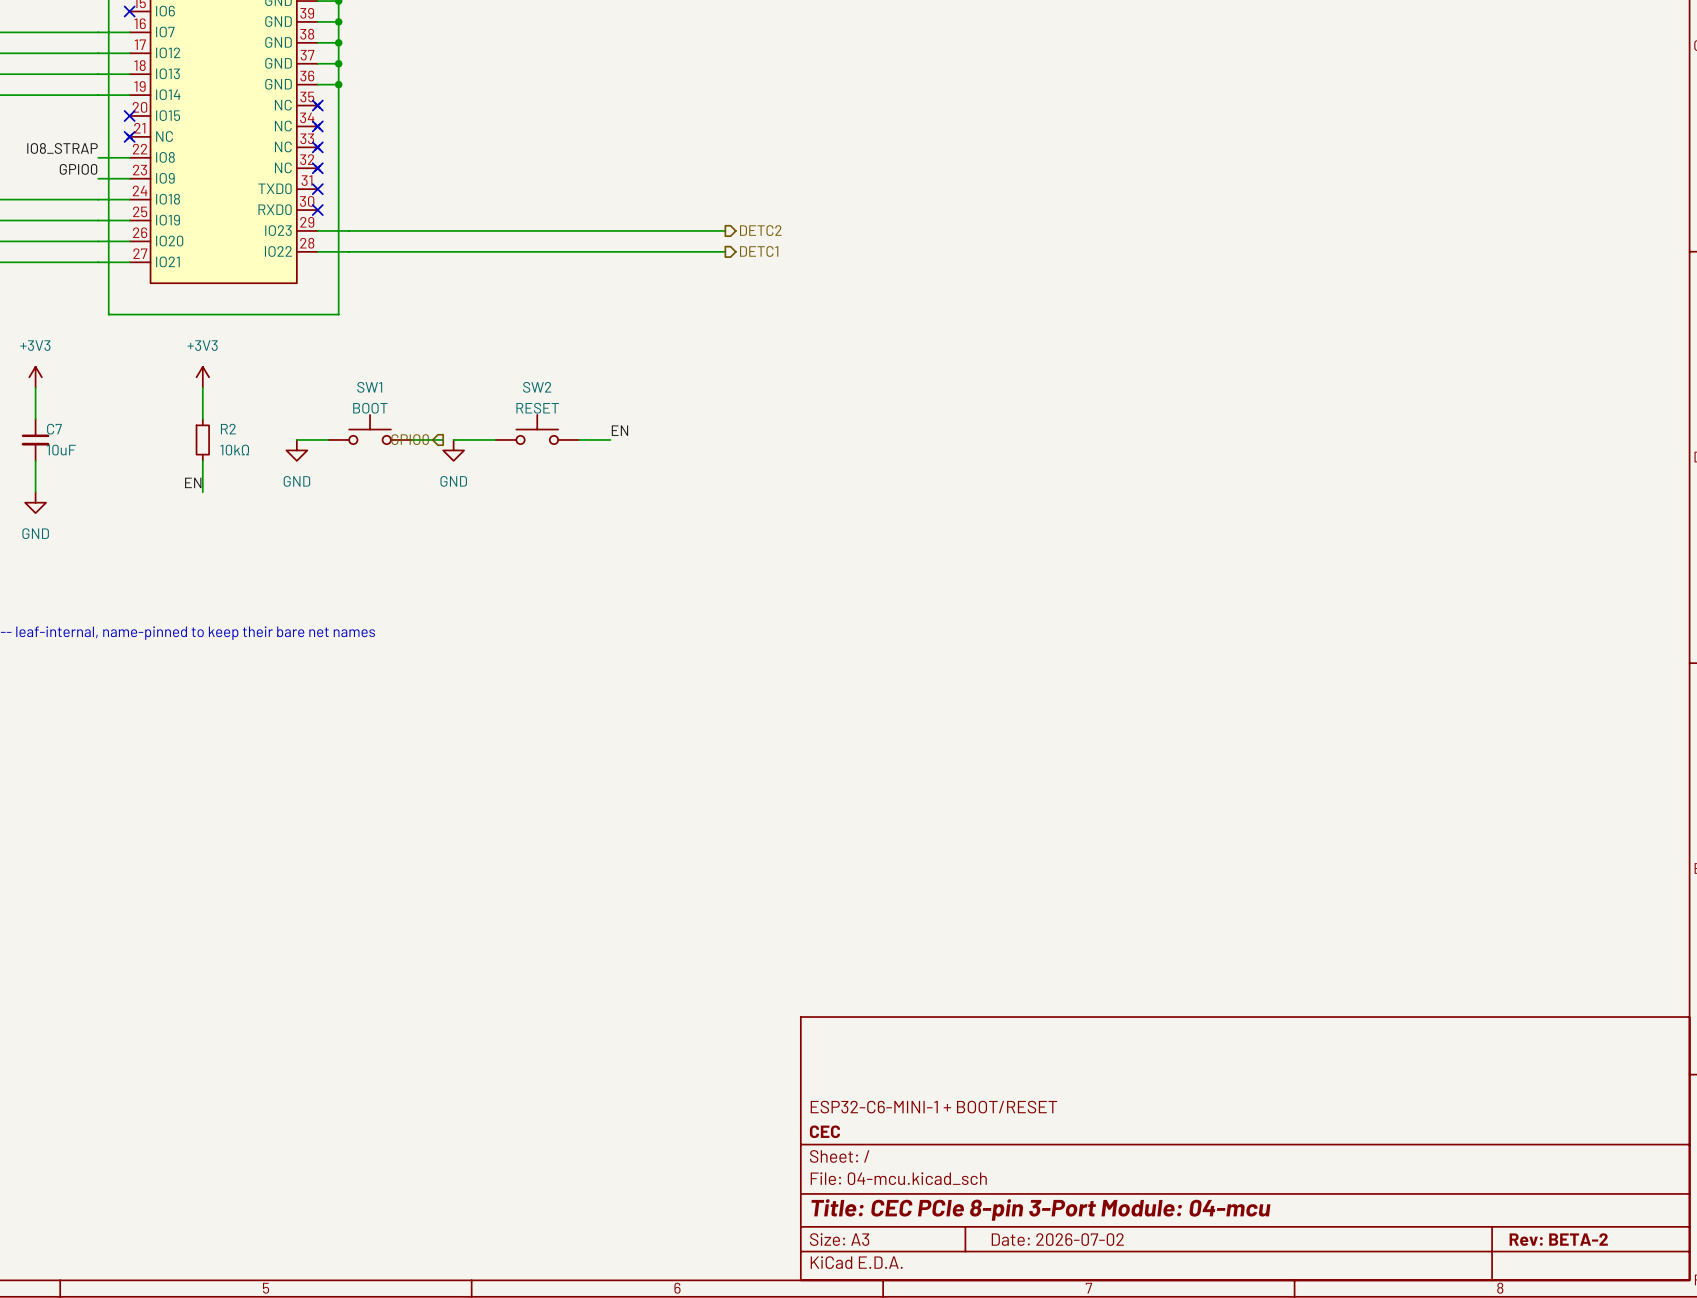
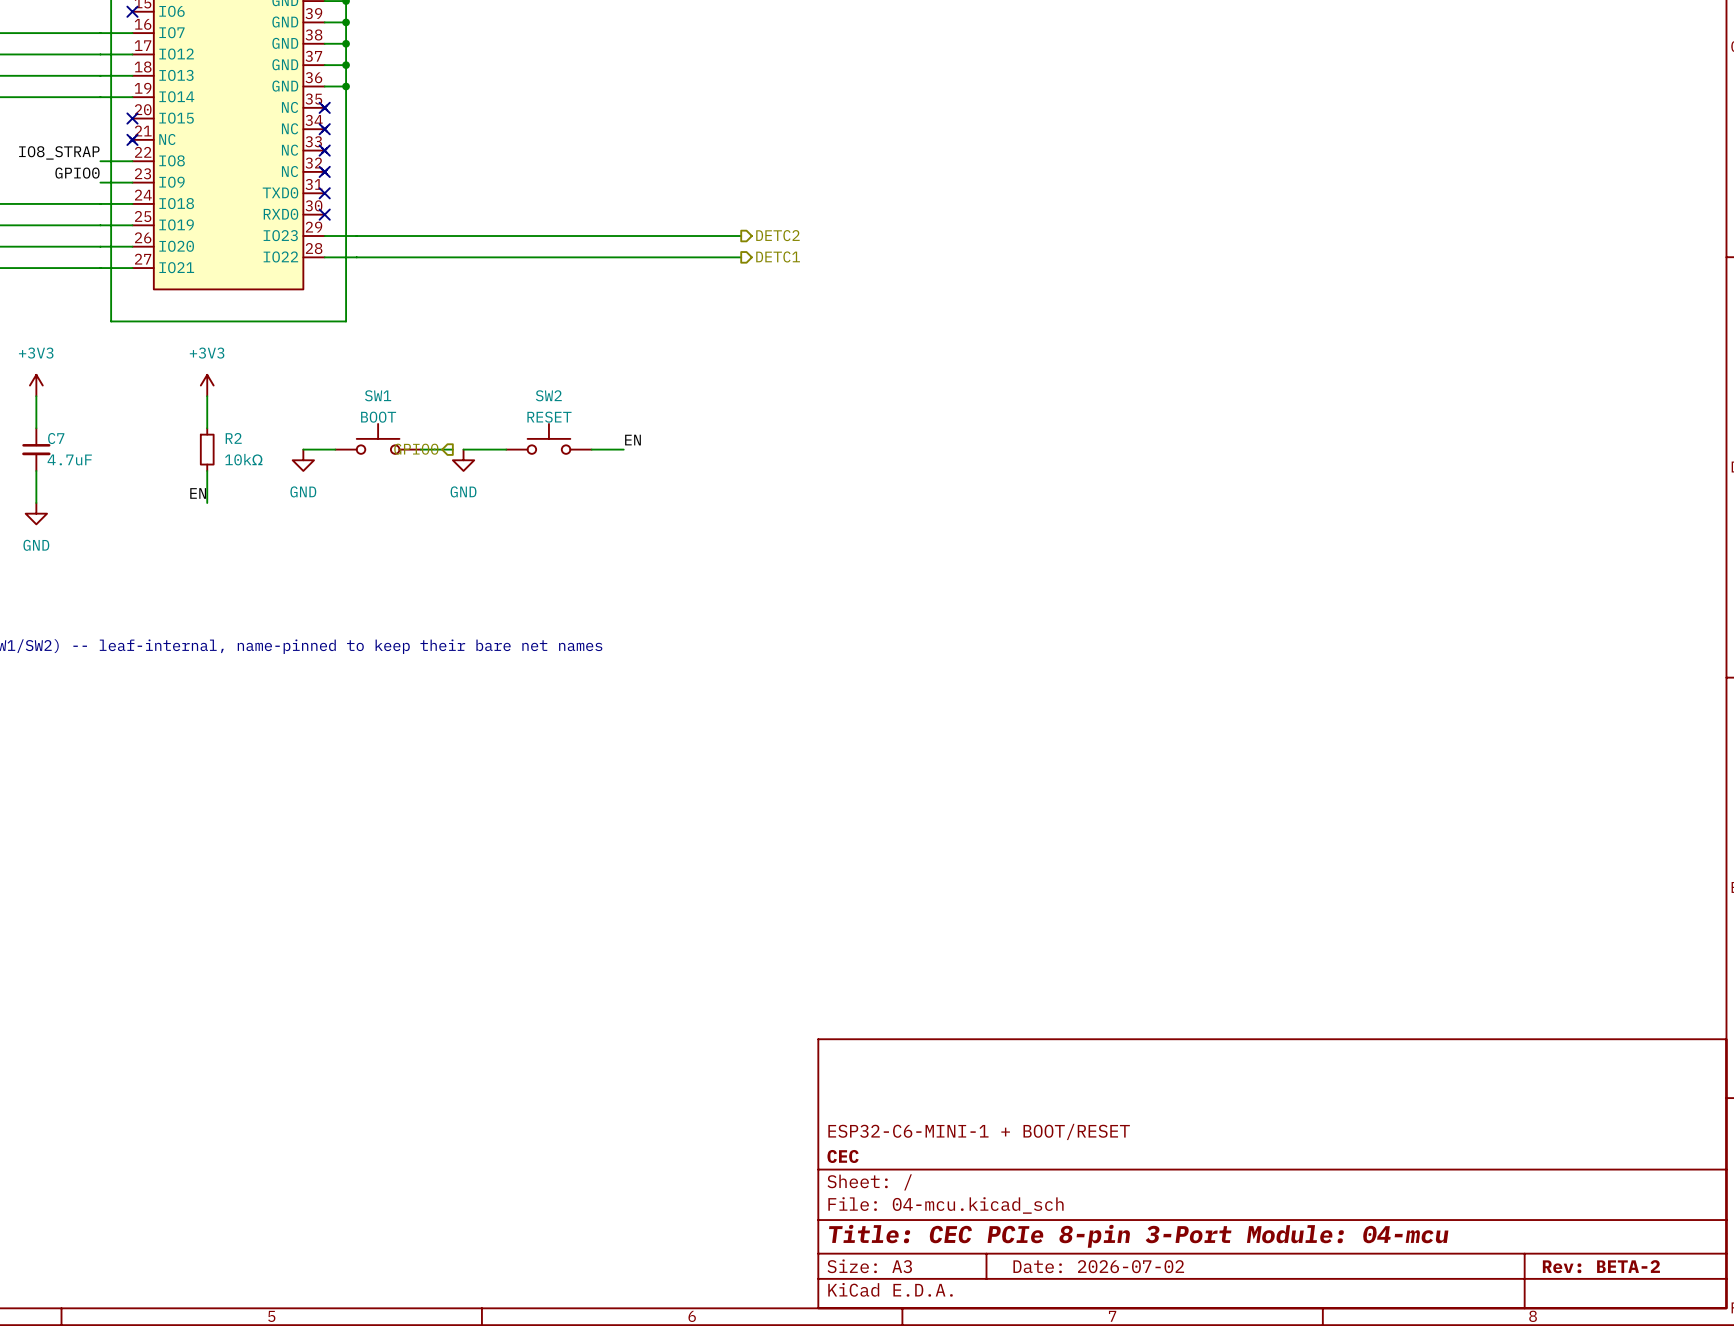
C7 value: 10uF (61, 450) -> 4.7uF (69, 459)

